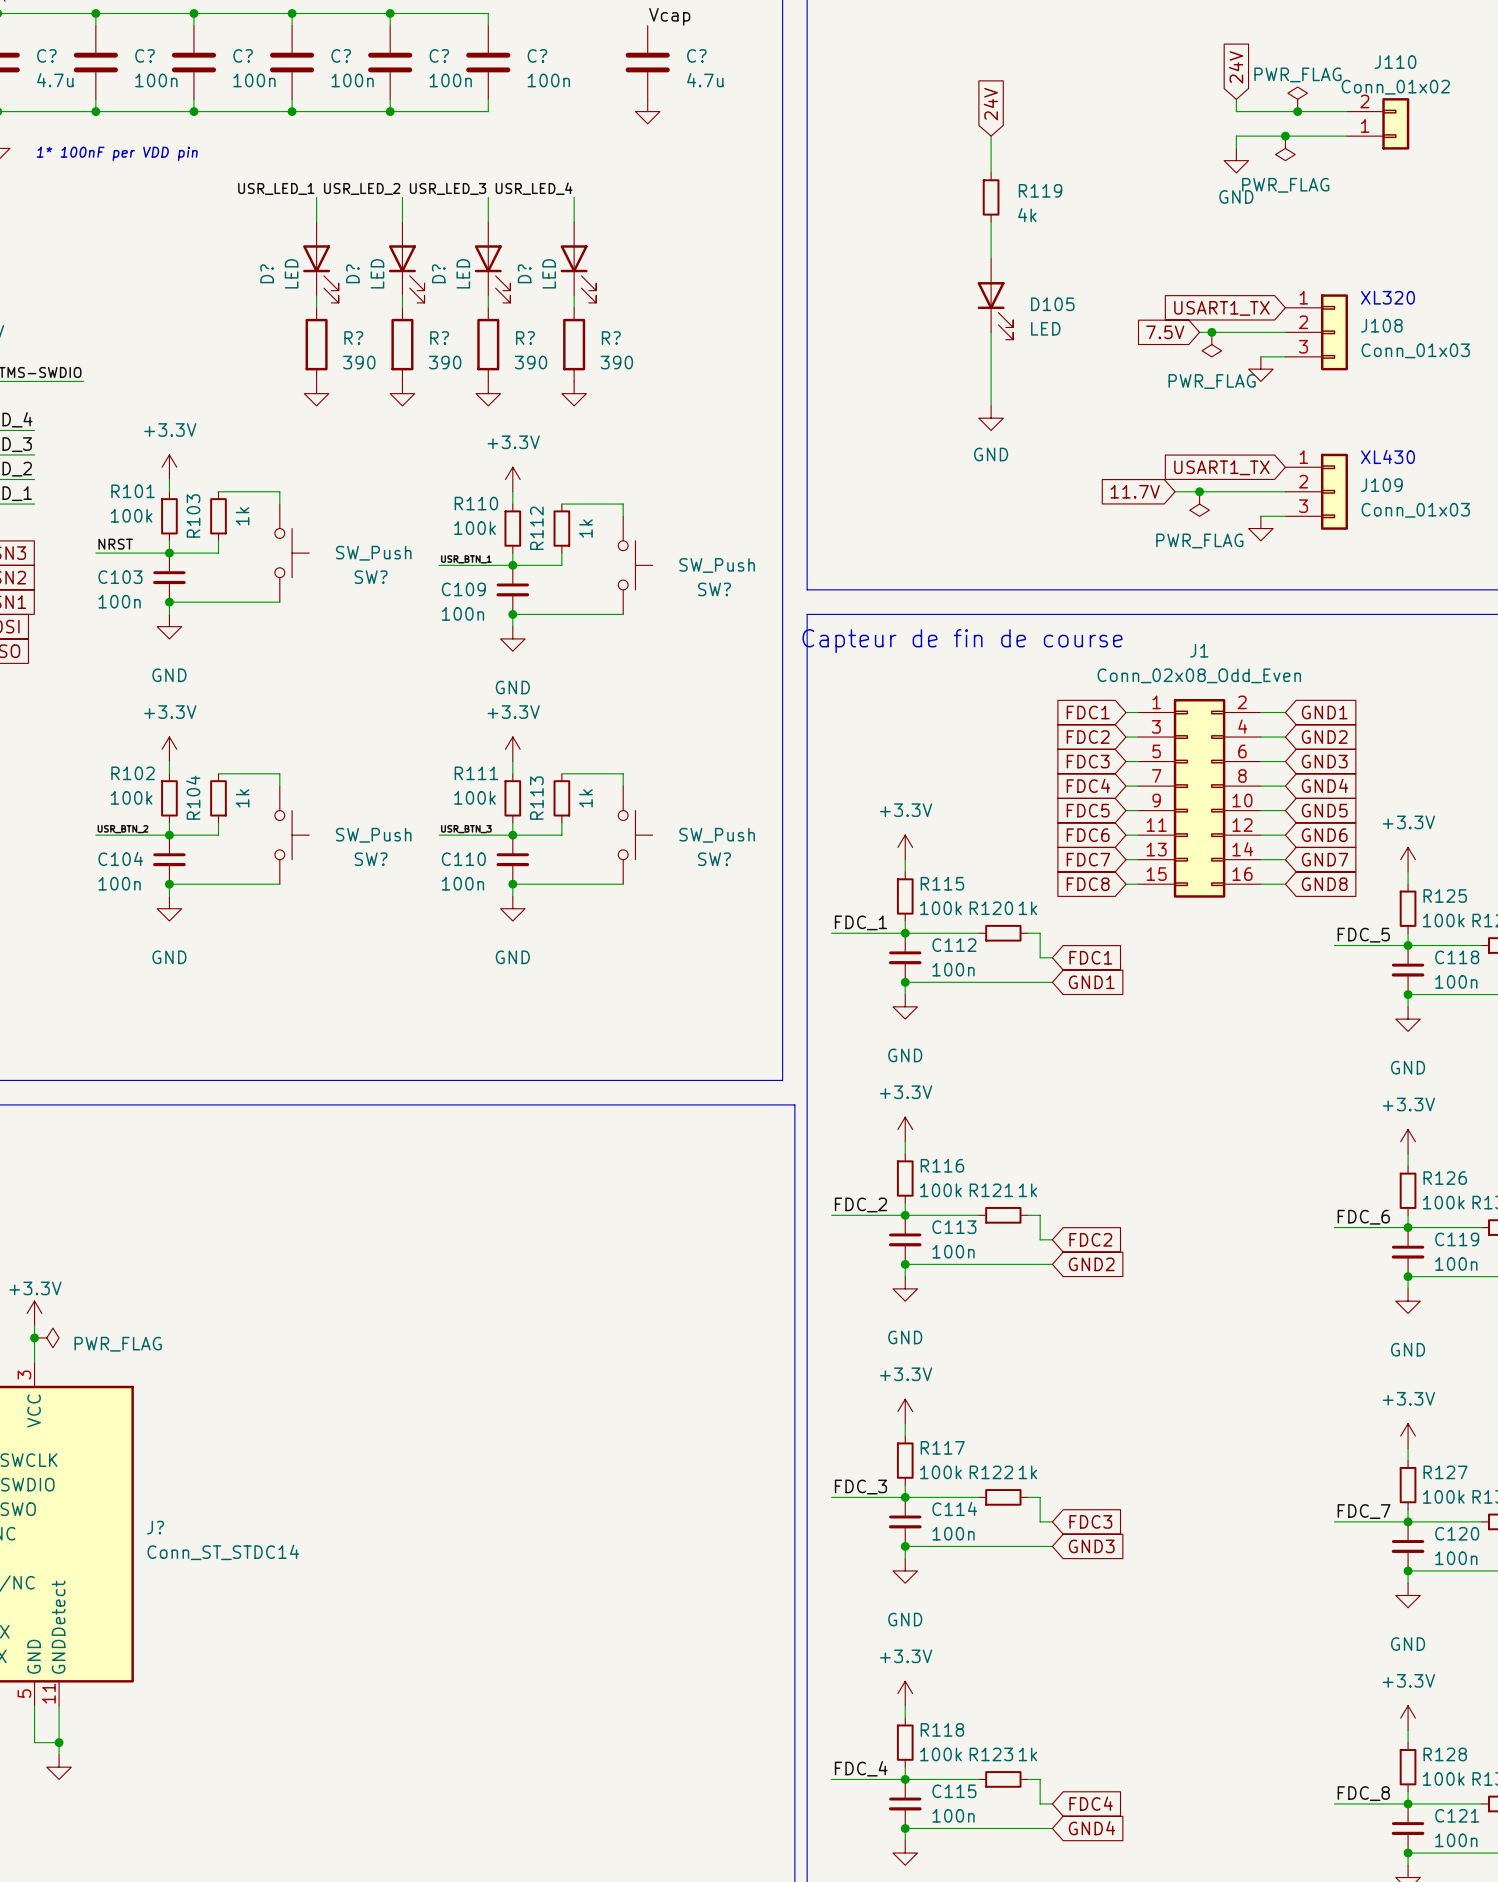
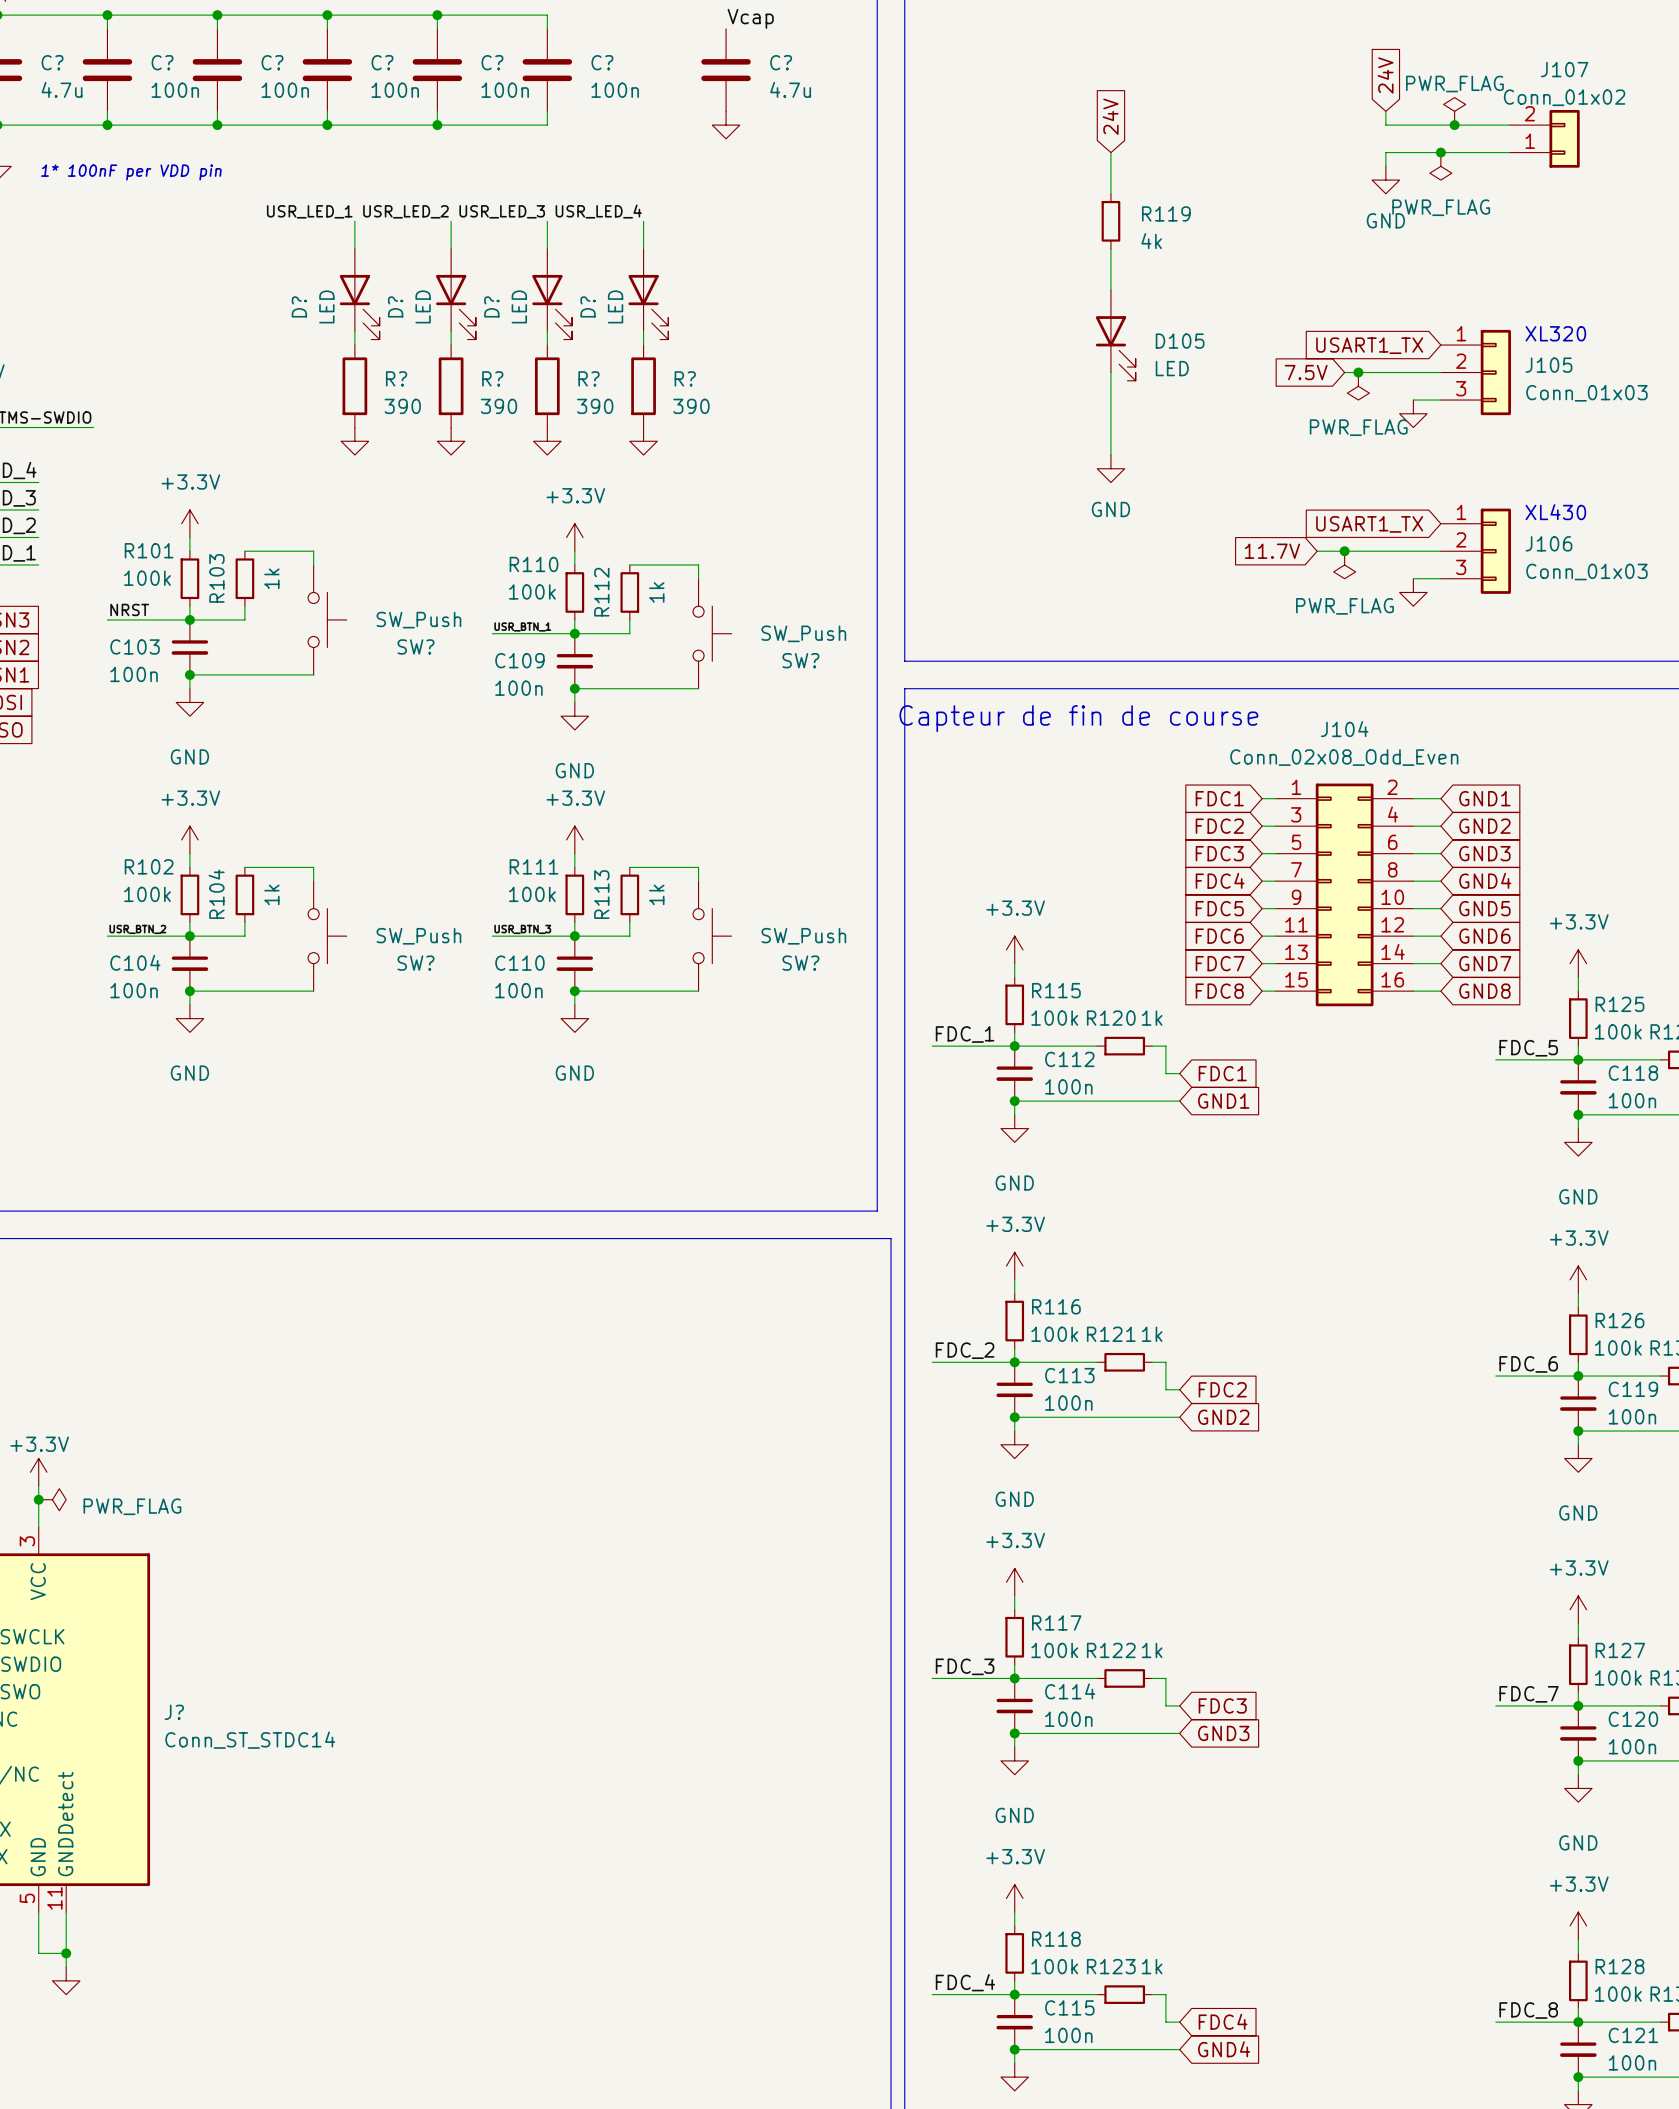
J110 name: J110 (1395, 62) -> J107 (1564, 69)
J108 name: J108 (1381, 325) -> J105 (1548, 365)
J109 name: J109 (1381, 485) -> J106 (1548, 543)
J1 name: J1 (1199, 650) -> J104 (1344, 729)

